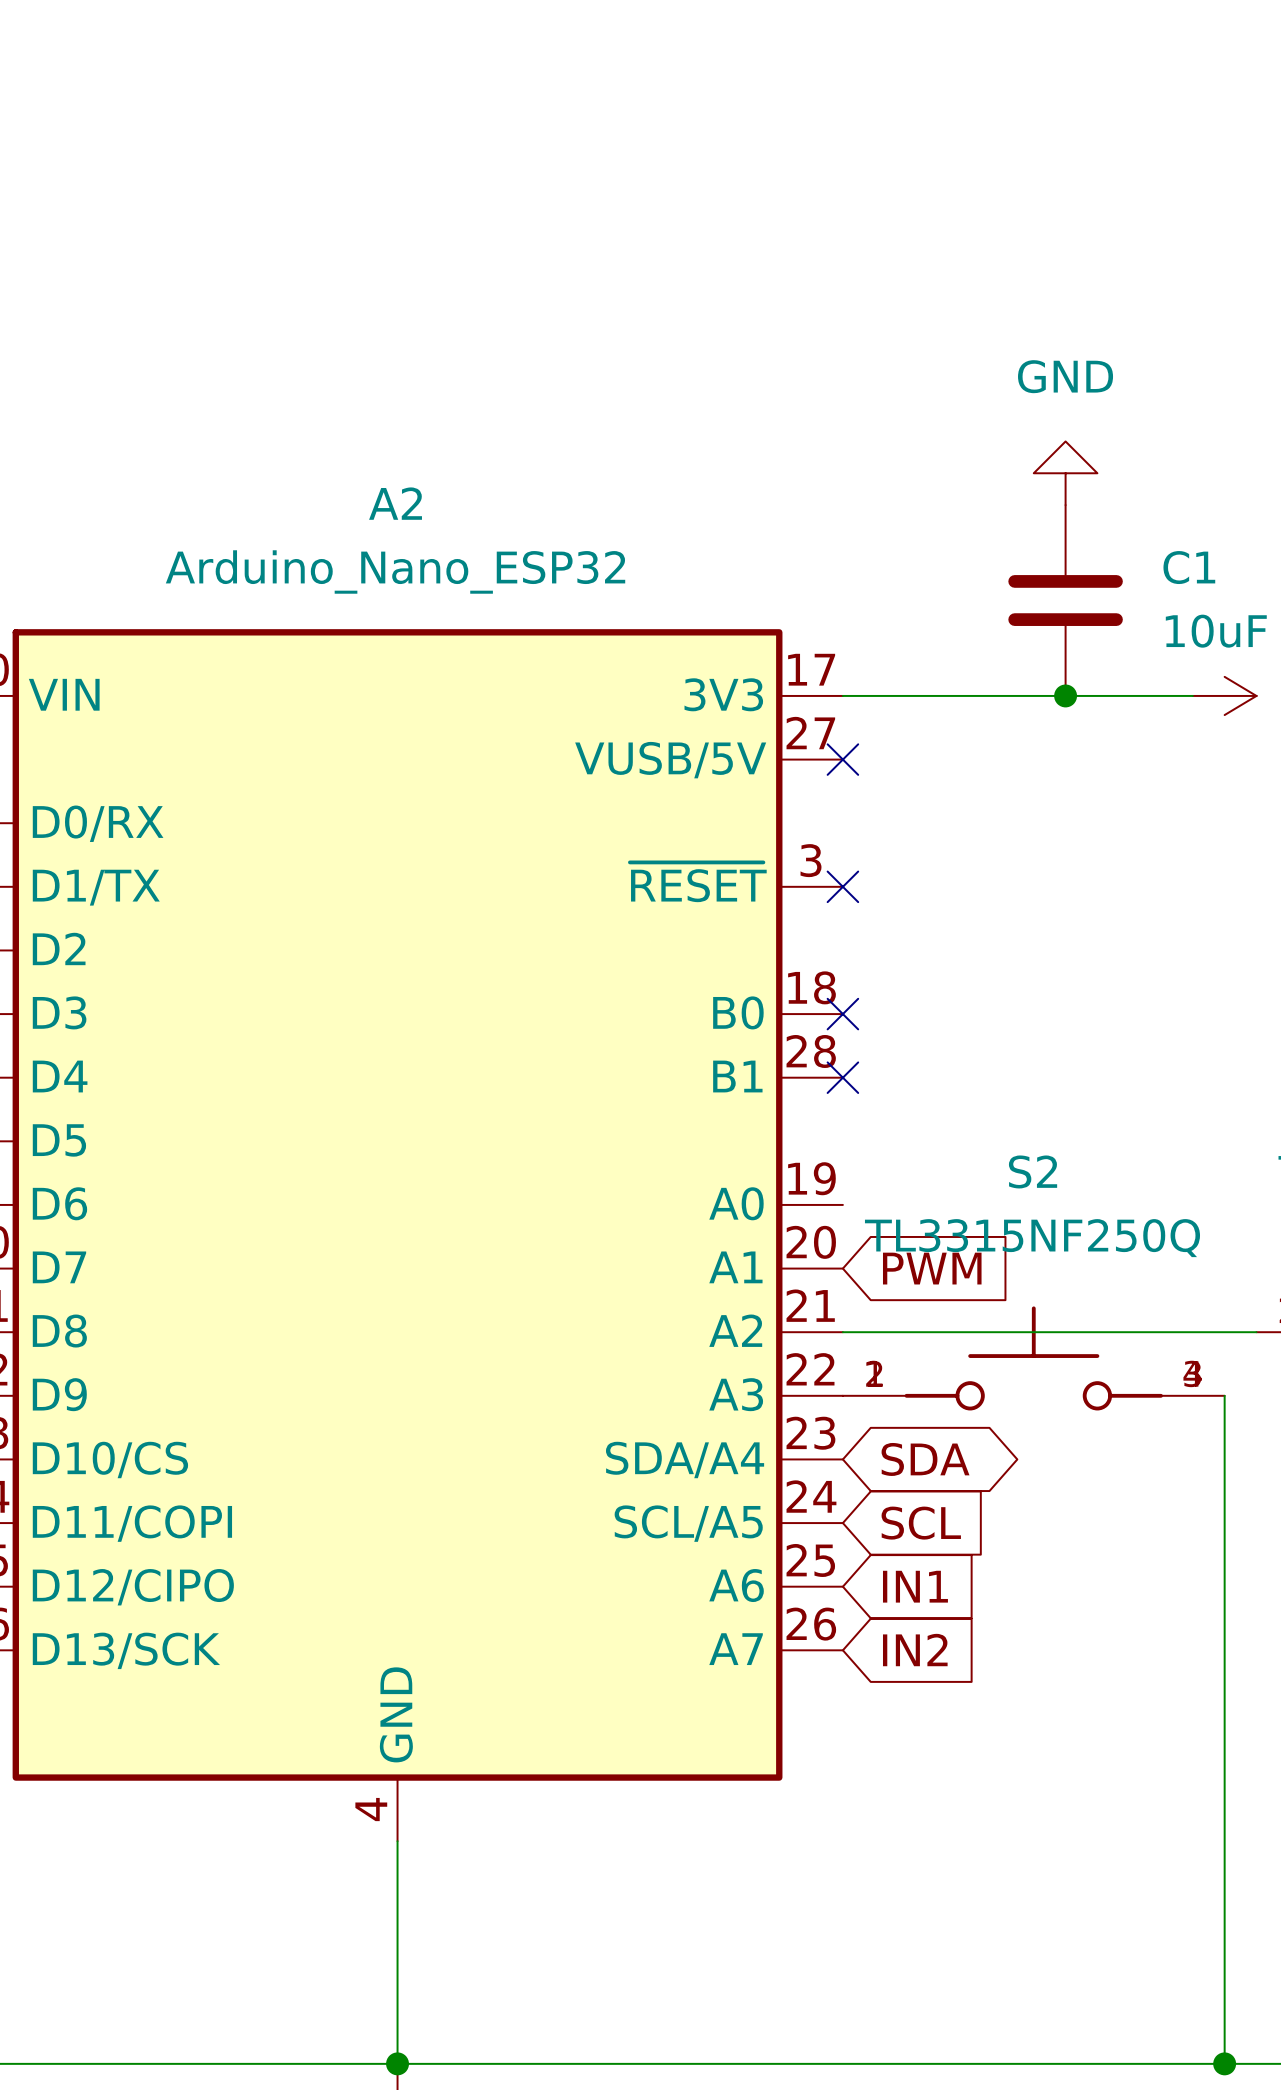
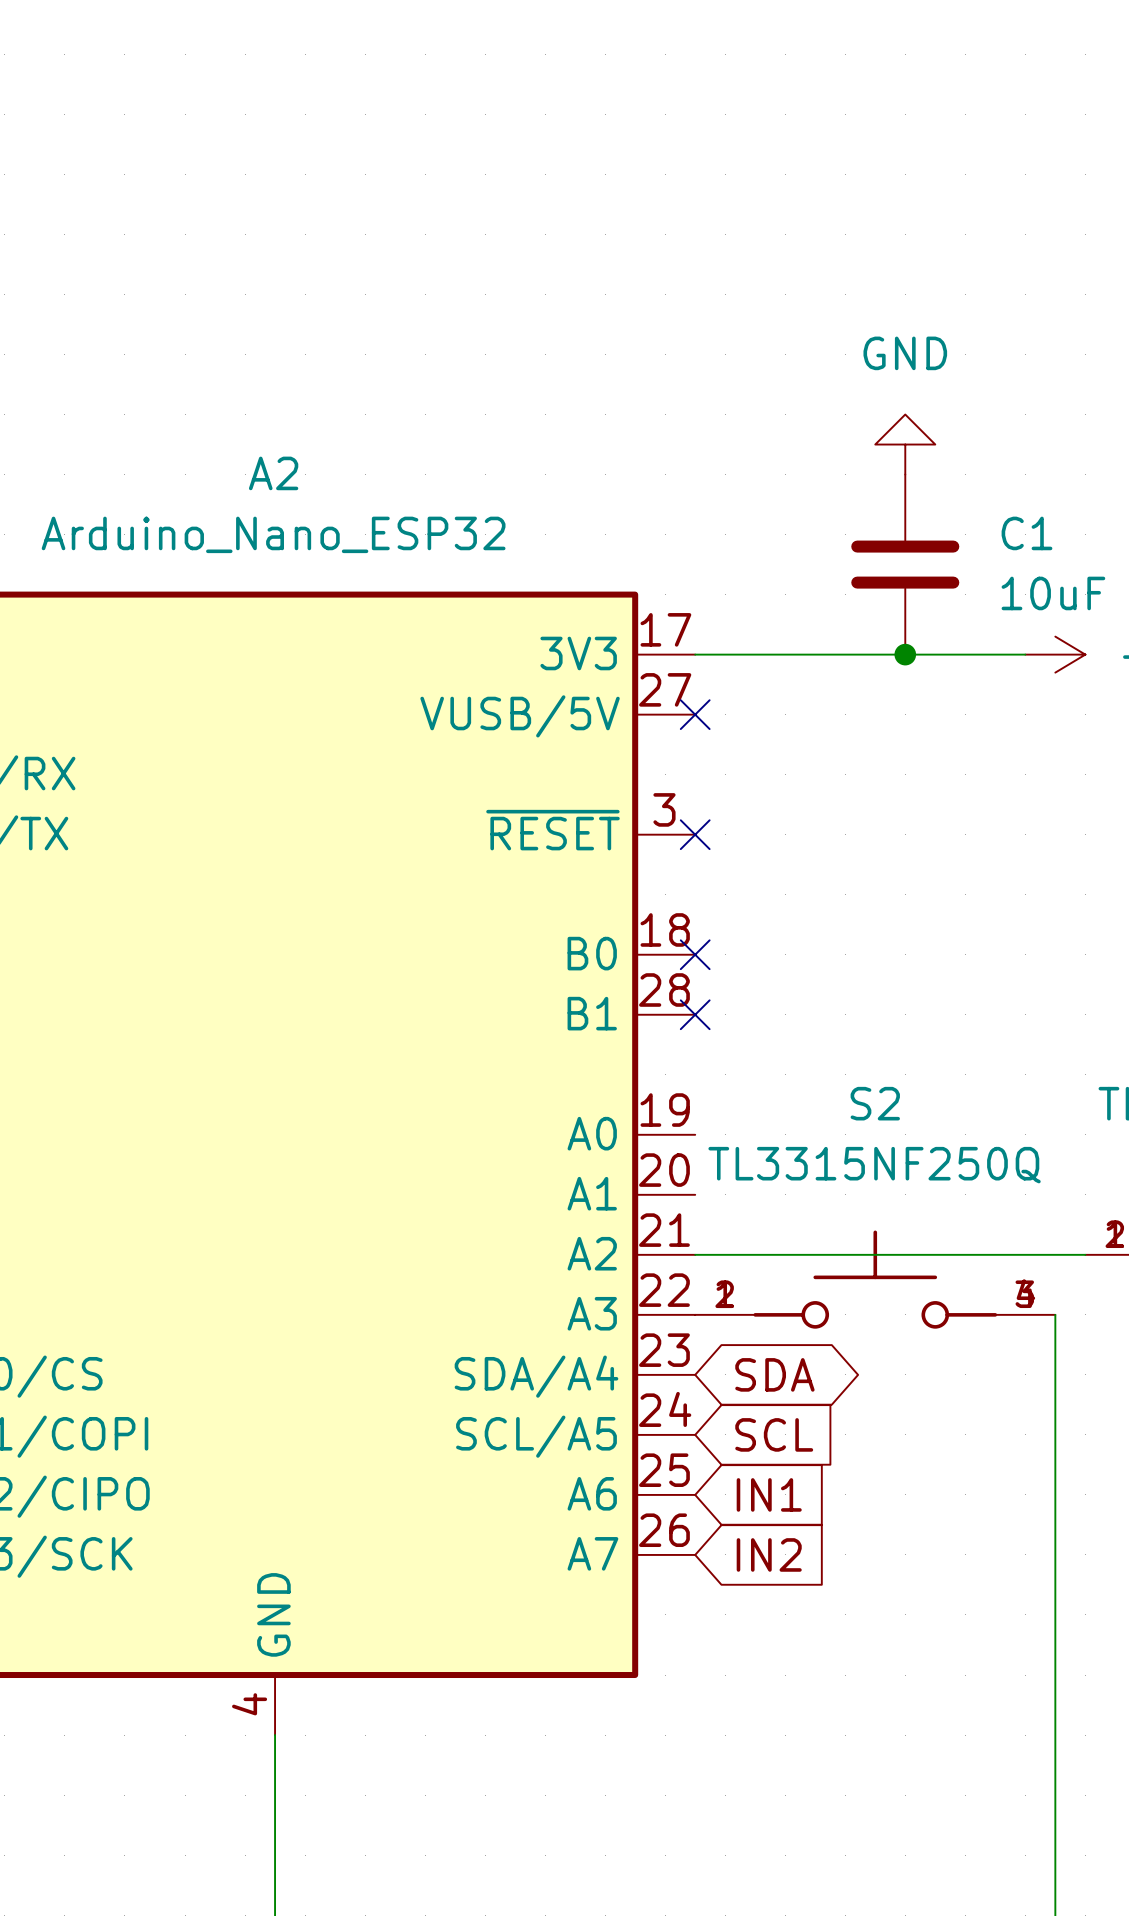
global label: PWM (932, 1268) -> none

